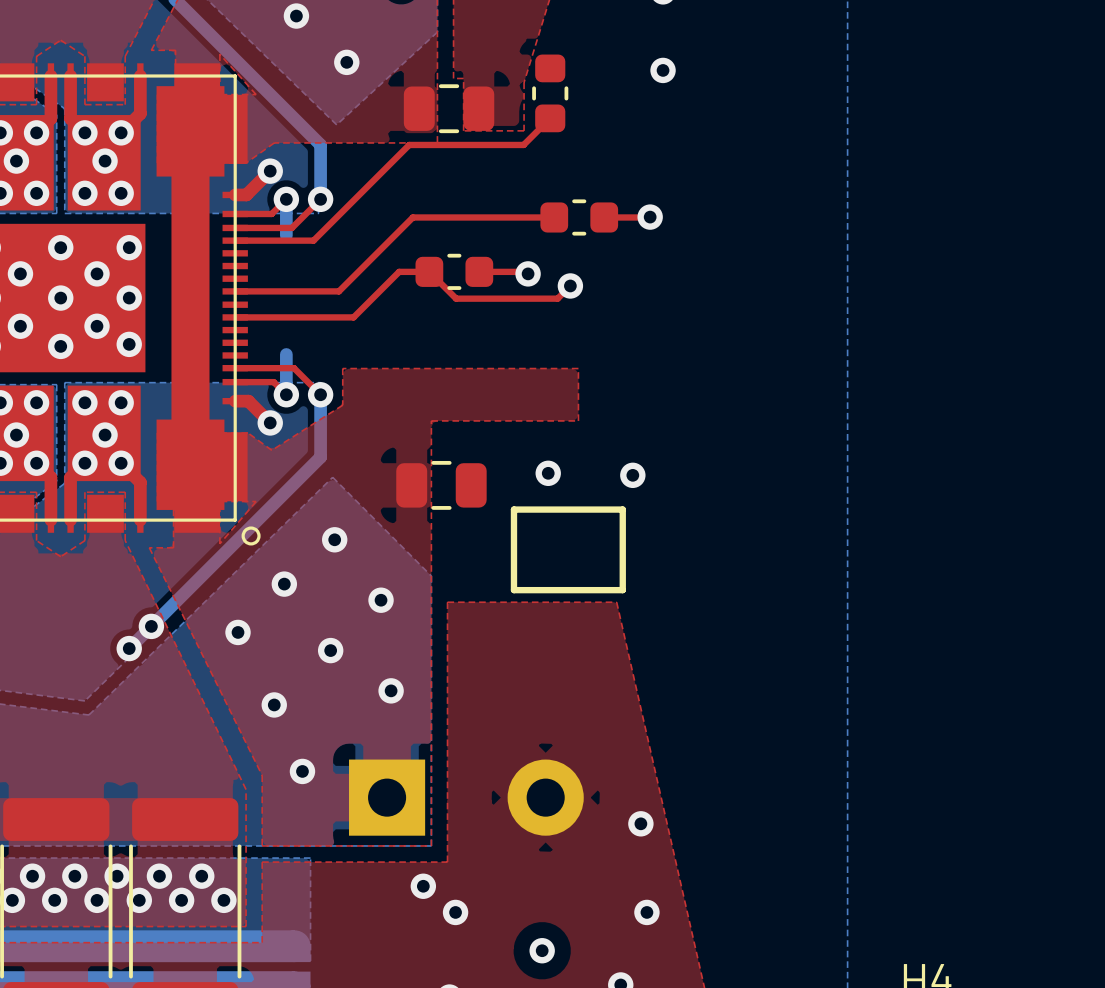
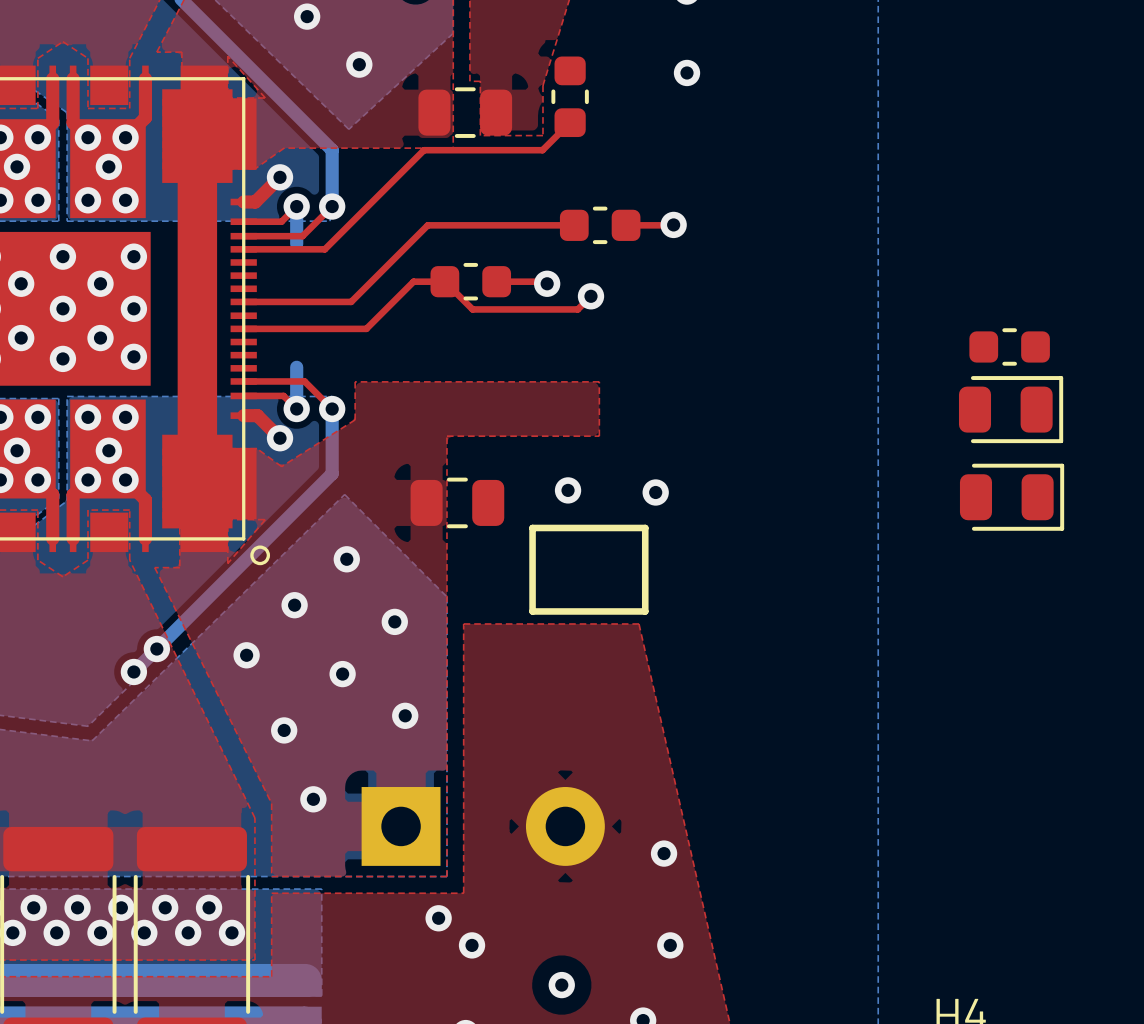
part: none -> (1009, 346)
part: none -> (1011, 409)
part: none -> (1012, 497)

